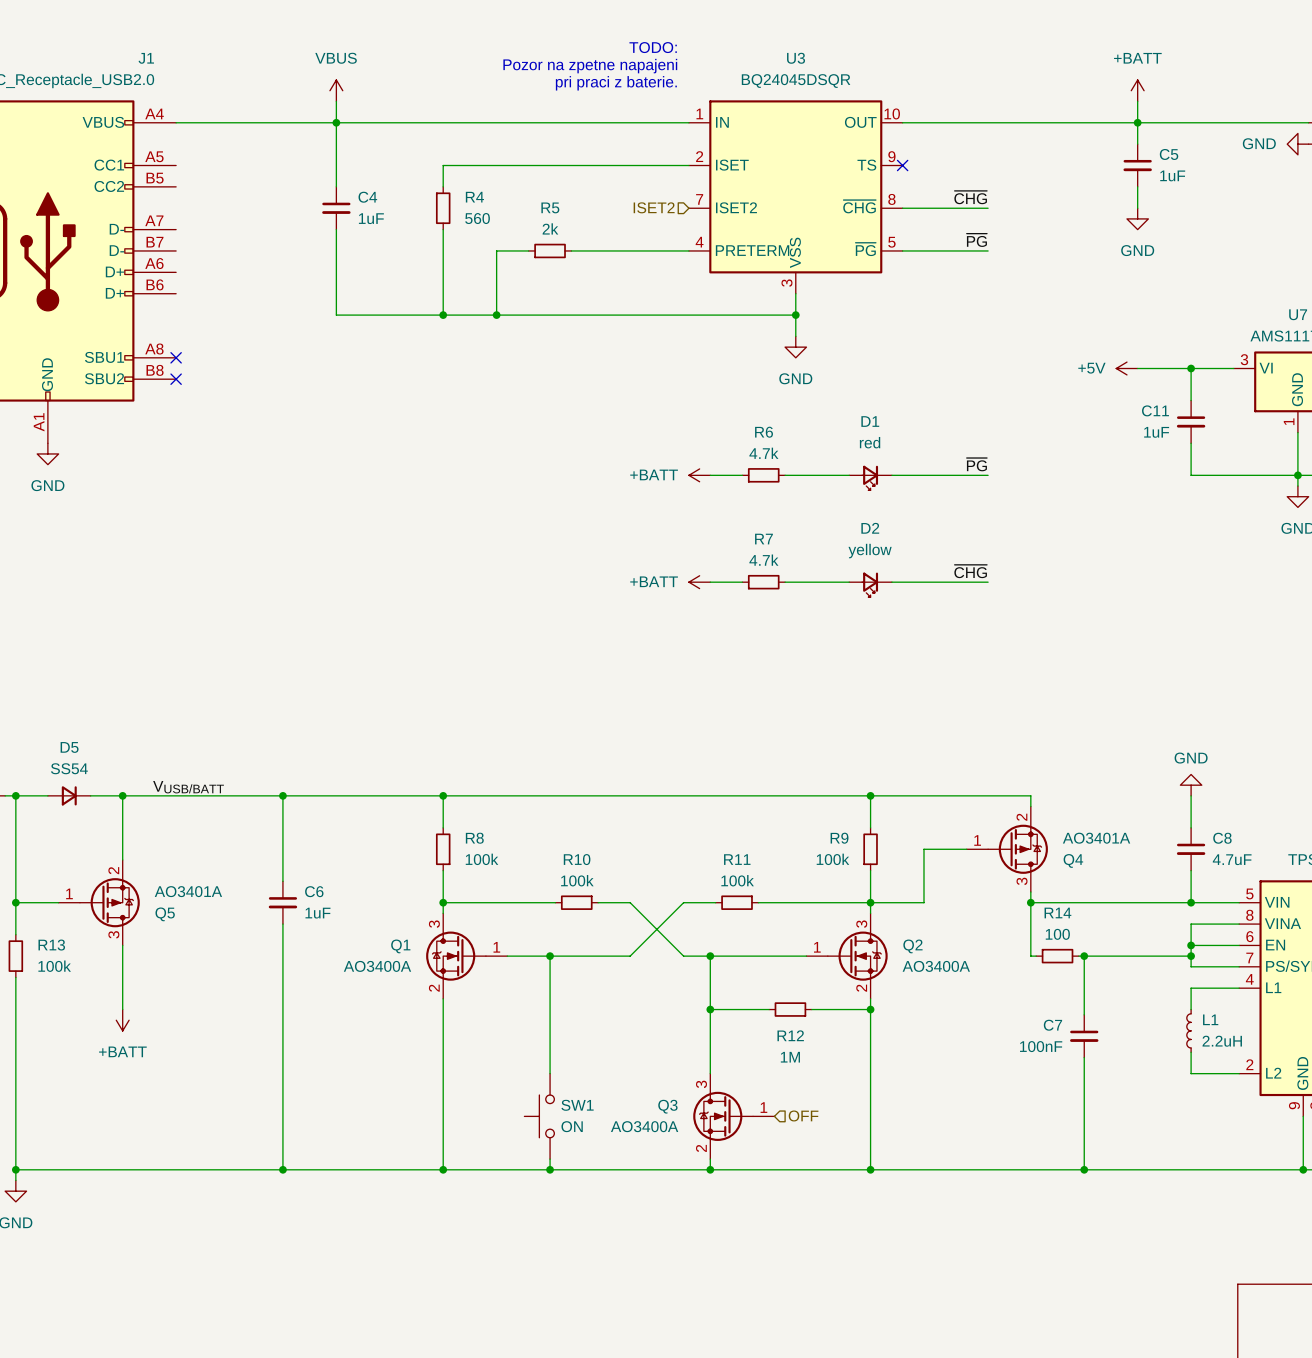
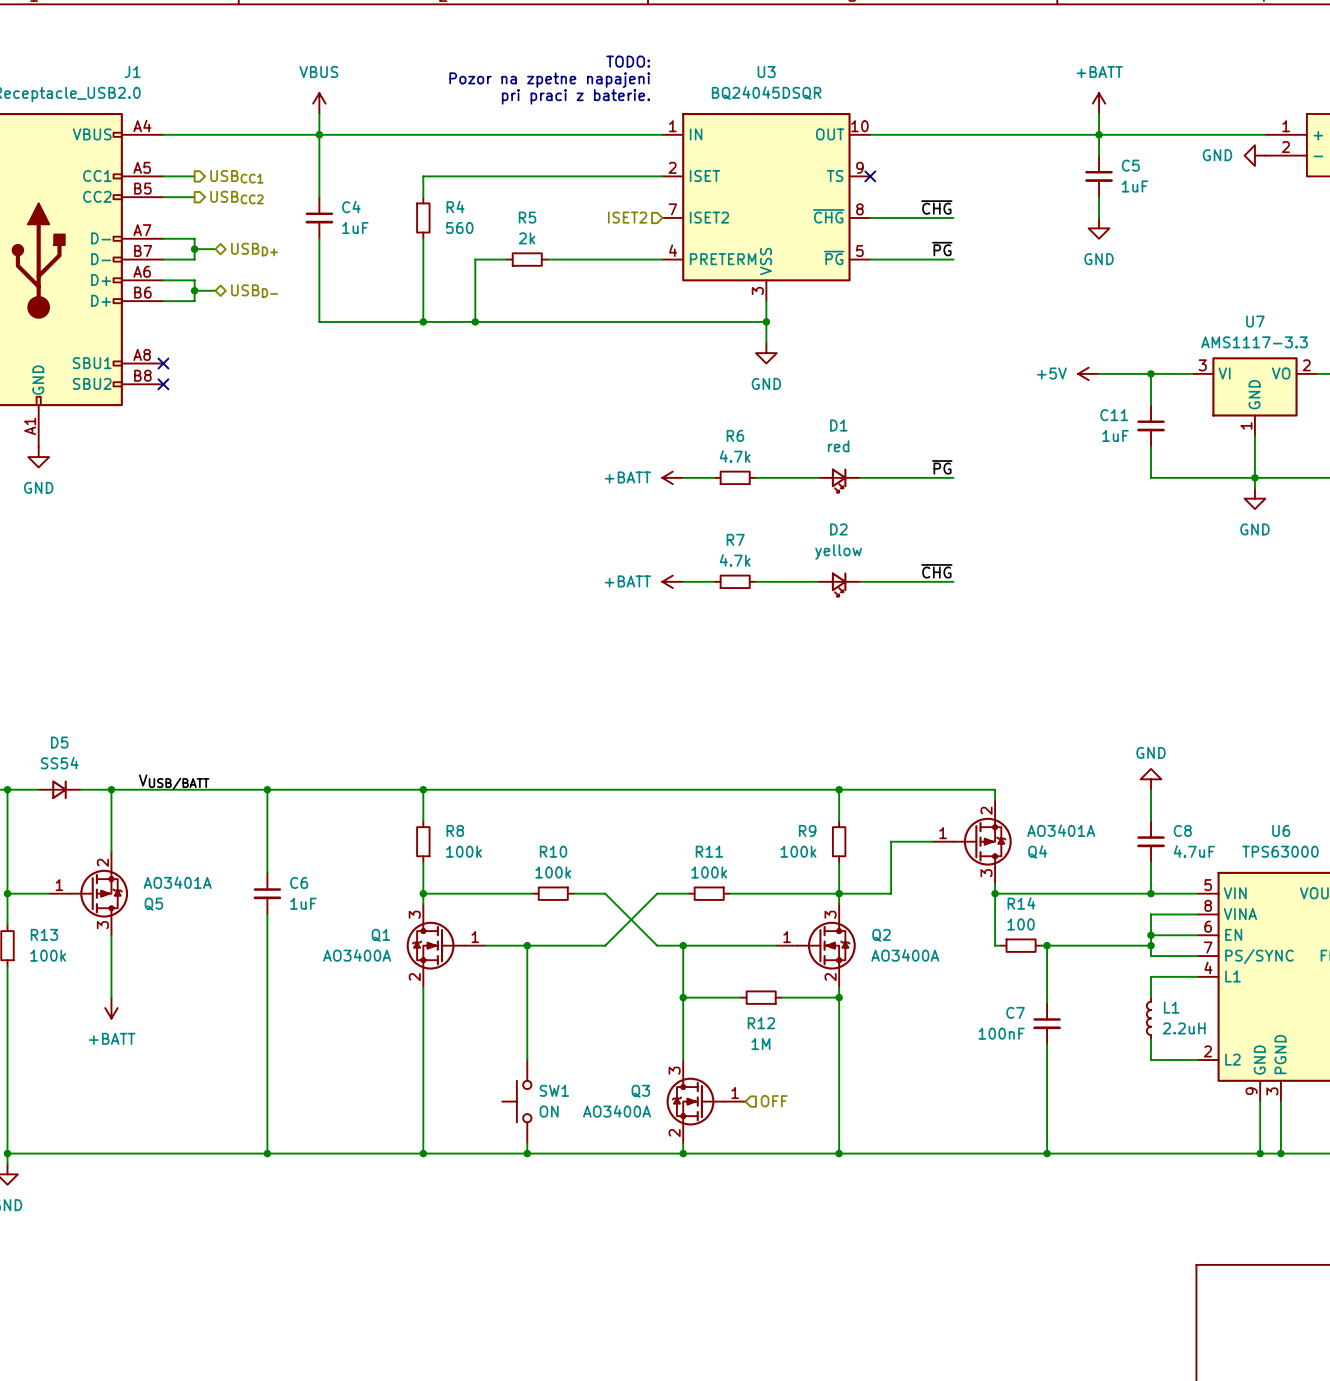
wire: none -> (163, 176) (194, 176)
hierarchical label: none -> USBCC1 (236, 176)
wire: none -> (163, 197) (194, 197)
hierarchical label: none -> USBCC2 (236, 197)
wire: none -> (163, 238) (194, 238) (194, 259) (163, 259)
wire: none -> (194, 249) (215, 249)
junction: none -> (194, 249)
hierarchical label: none -> USBD+ (254, 249)
wire: none -> (163, 280) (194, 280) (194, 301) (163, 301)
wire: none -> (194, 290) (215, 290)
junction: none -> (194, 290)
hierarchical label: none -> USBD- (254, 291)

